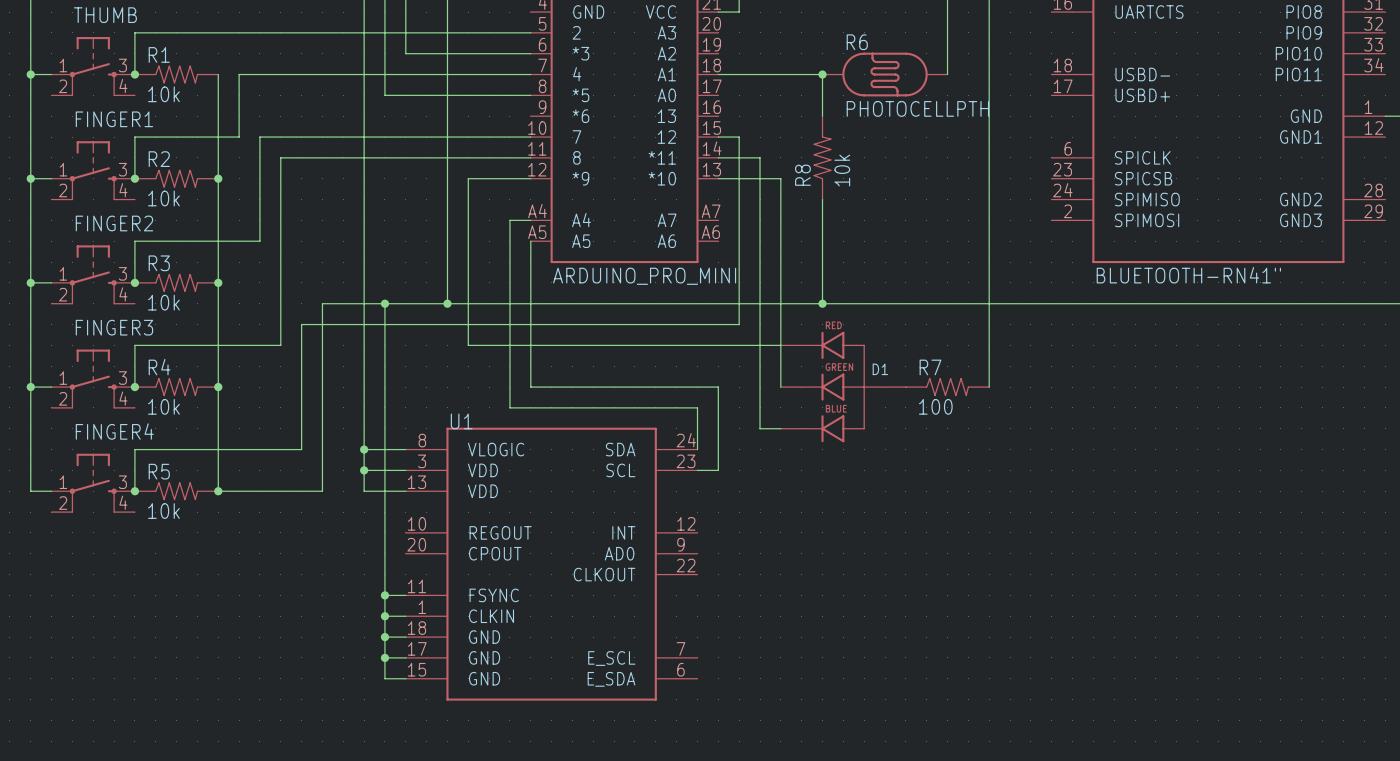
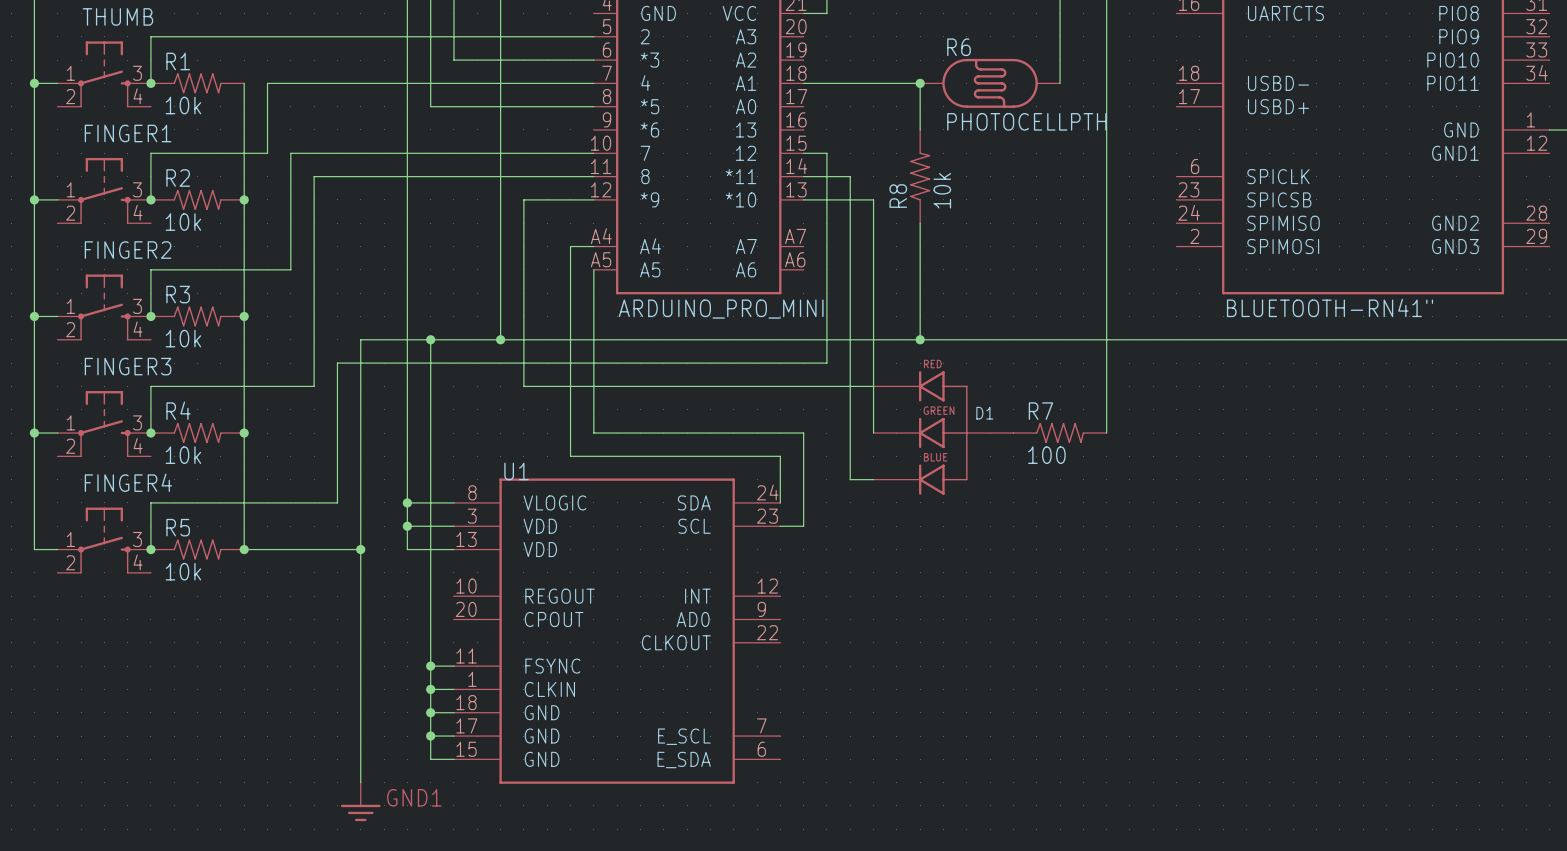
wire: none -> (360, 549) (360, 782)
junction: none -> (360, 549)
GND1: none -> (360, 801)

